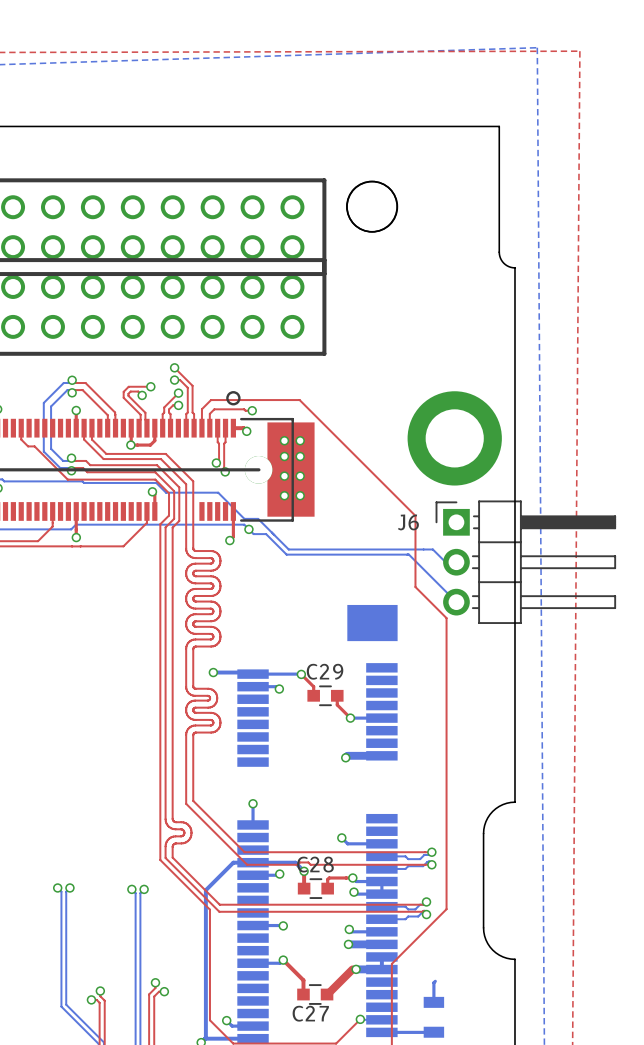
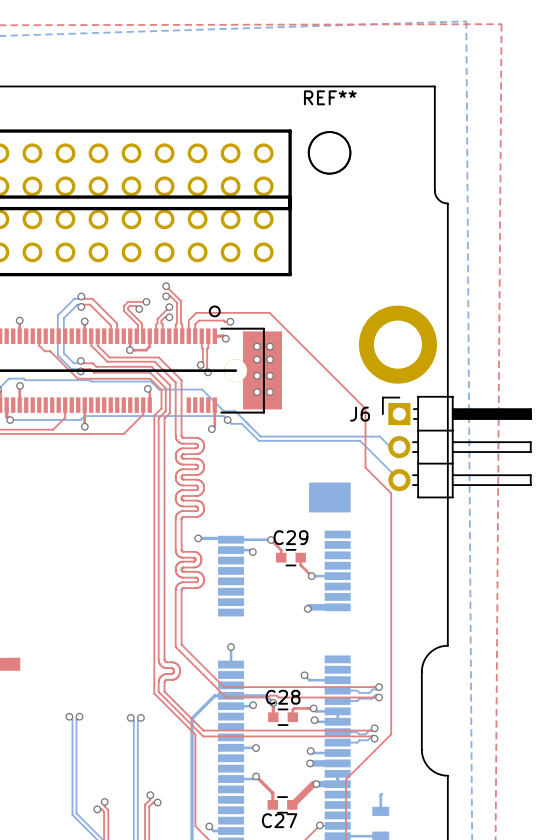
REF** name: none -> REF** (330, 97)

